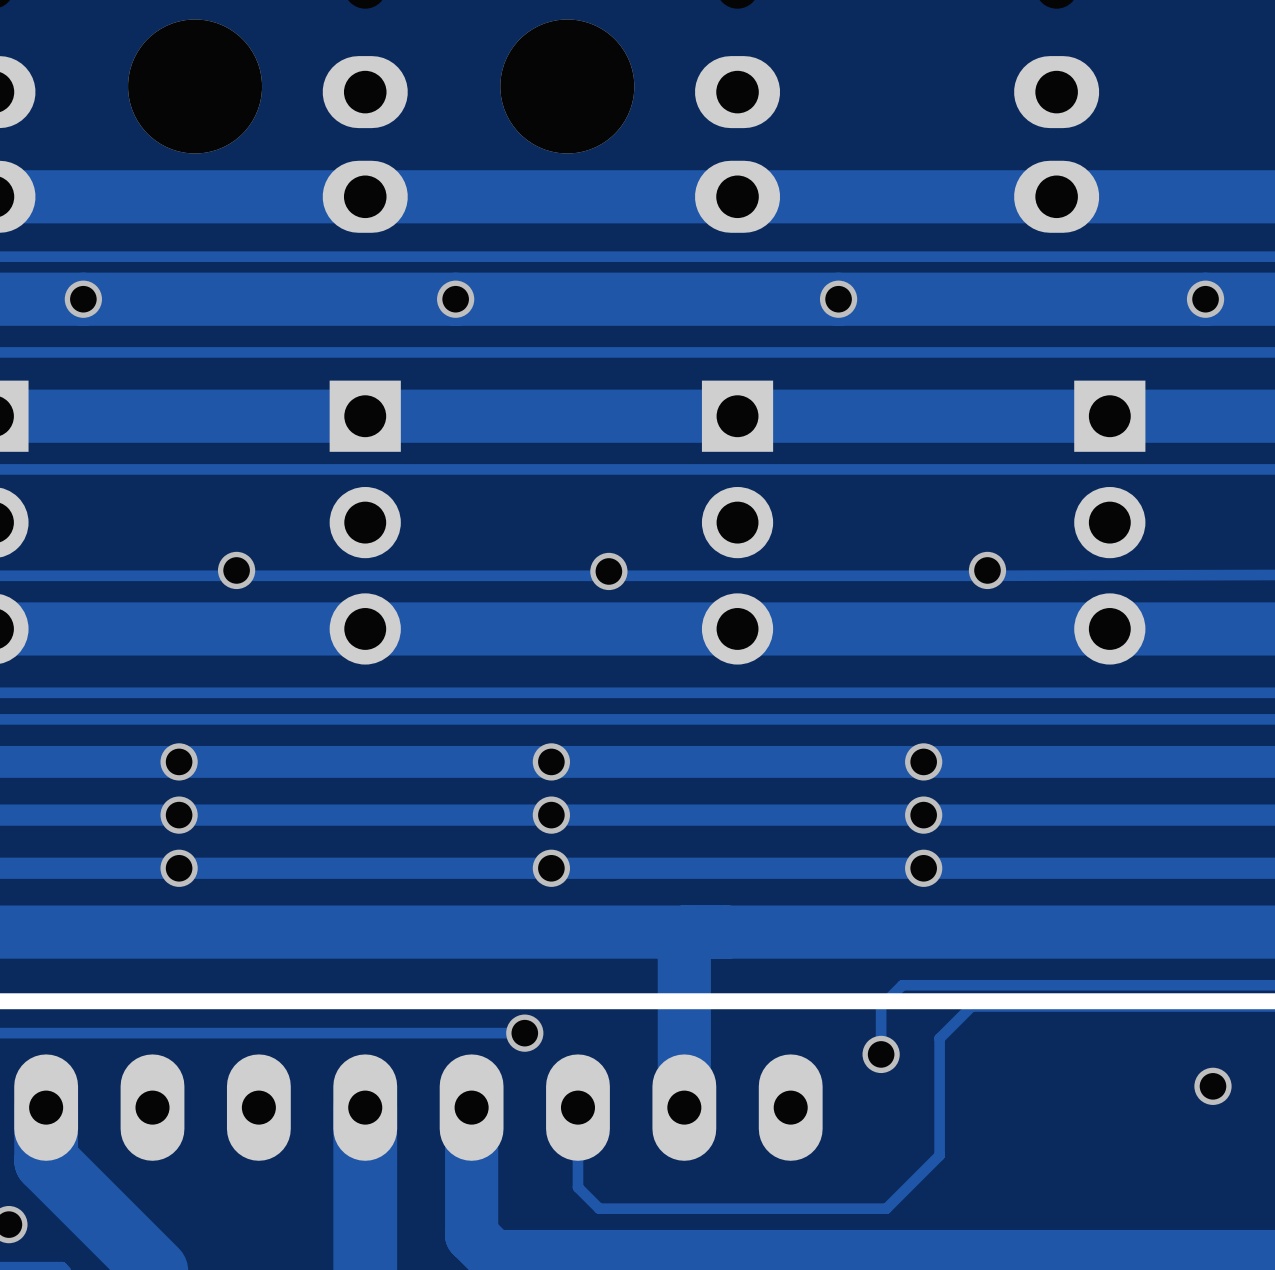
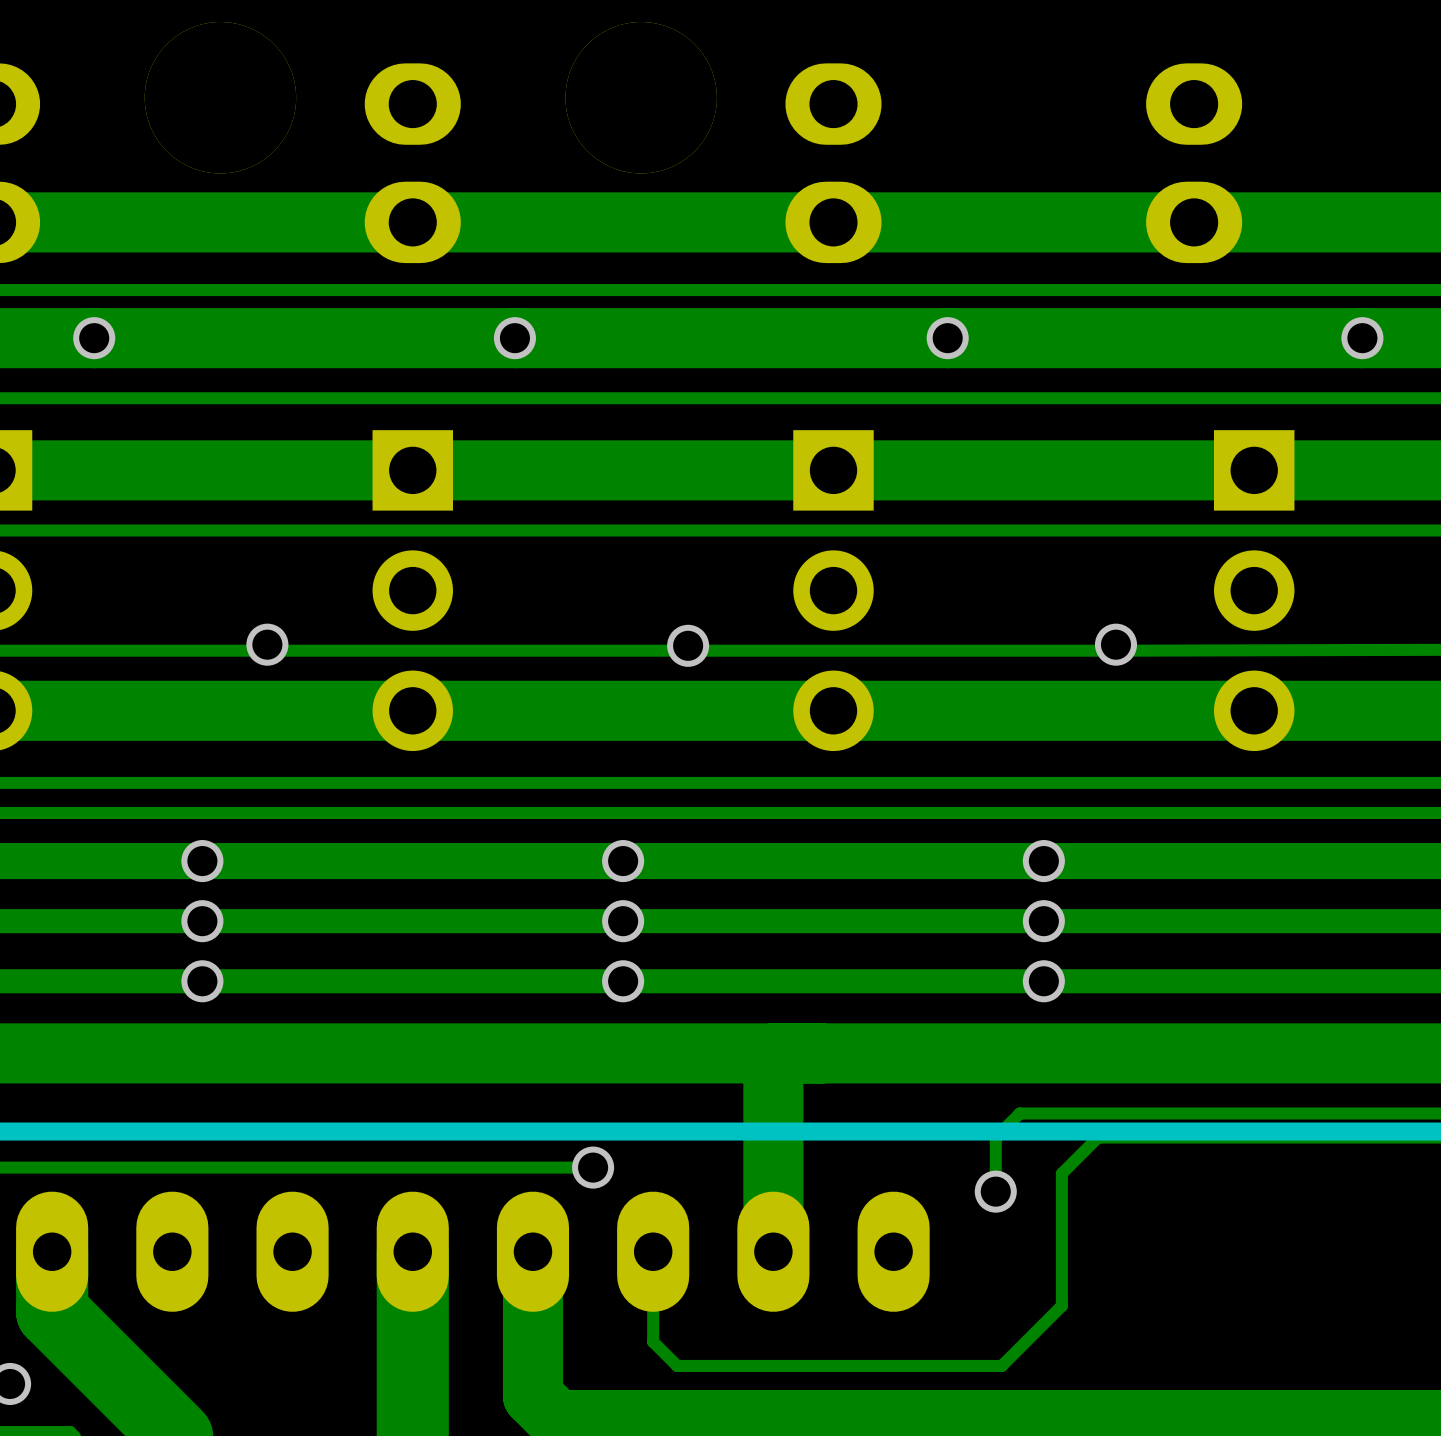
via: (1212, 1086) -> none

